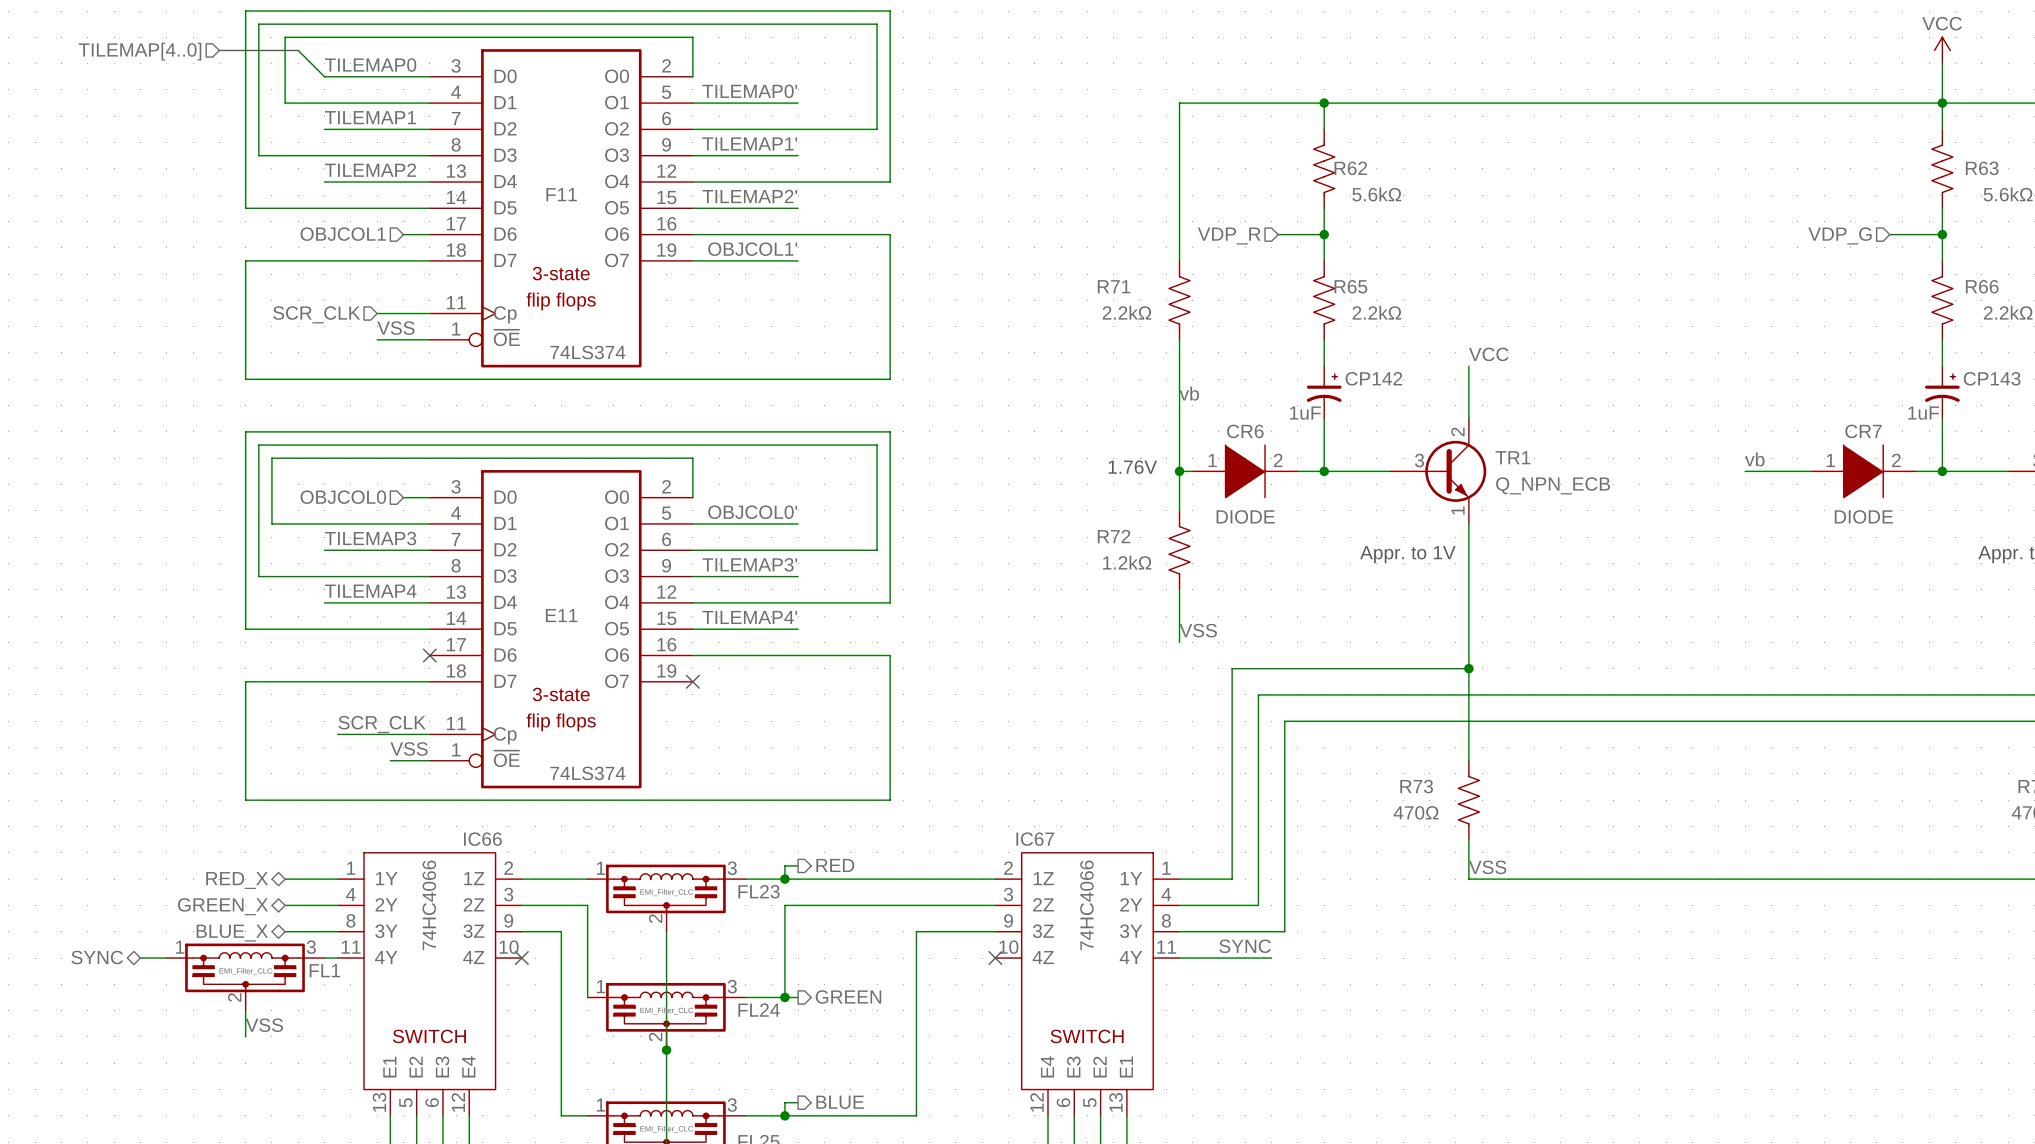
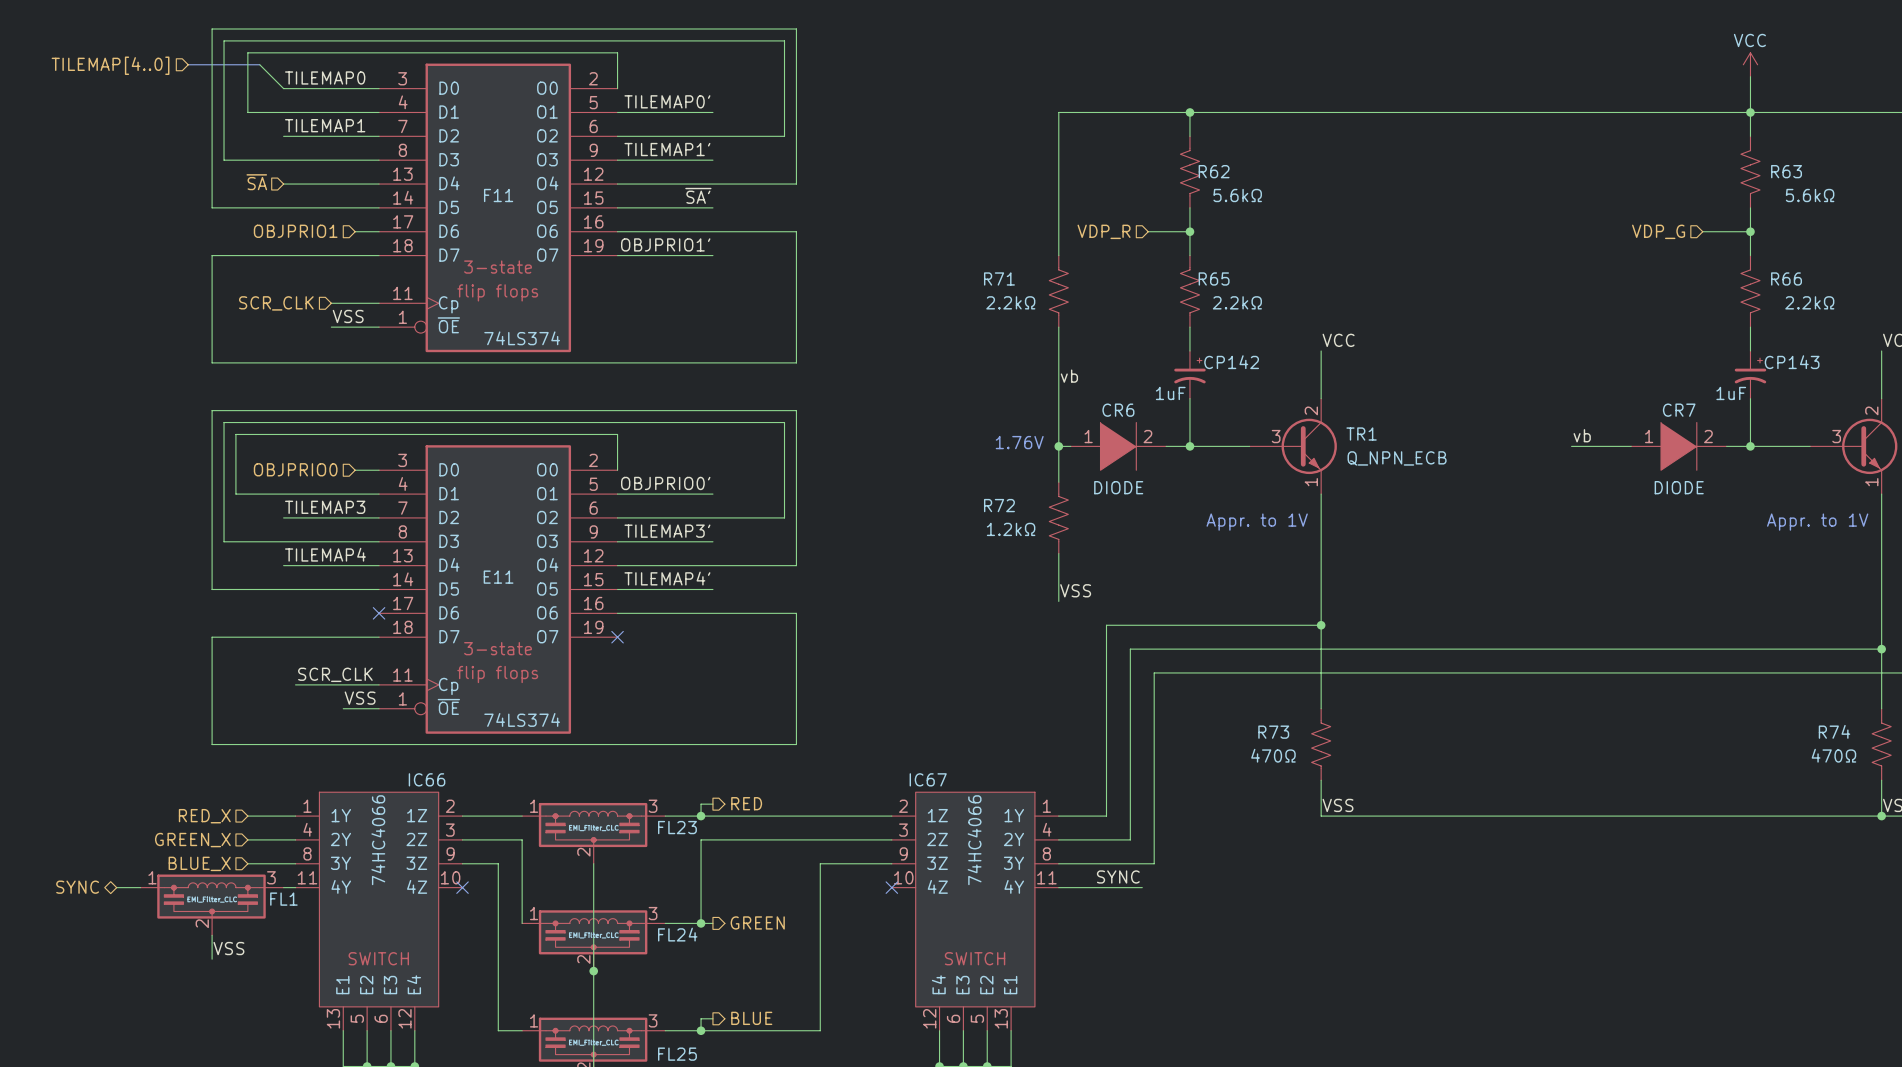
label: TILEMAP2 (370, 170) -> none
hierarchical label: none -> ~{SA} (256, 182)
label: TILEMAP2' (749, 196) -> ~{SA'} (698, 195)
hierarchical label: OBJCOL1 (343, 234) -> OBJPRIO1 (295, 231)
label: OBJCOL1' (752, 249) -> OBJPRIO1' (665, 244)
hierarchical label: OBJCOL0 (343, 497) -> OBJPRIO0 (295, 469)
label: OBJCOL0' (752, 512) -> OBJPRIO0' (665, 483)
hierarchical label shape: bidirectional (237, 880) -> input (204, 816)
hierarchical label shape: bidirectional (223, 906) -> input (192, 840)
hierarchical label shape: bidirectional (232, 933) -> input (199, 863)

